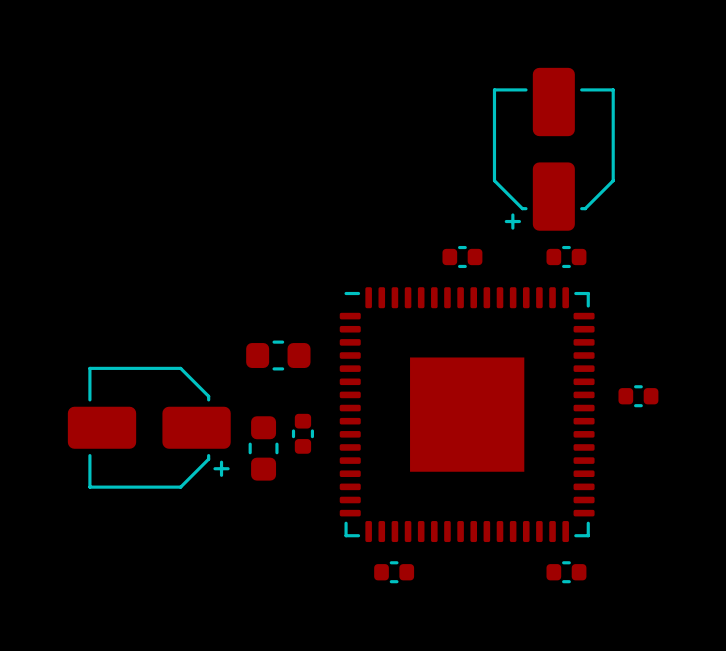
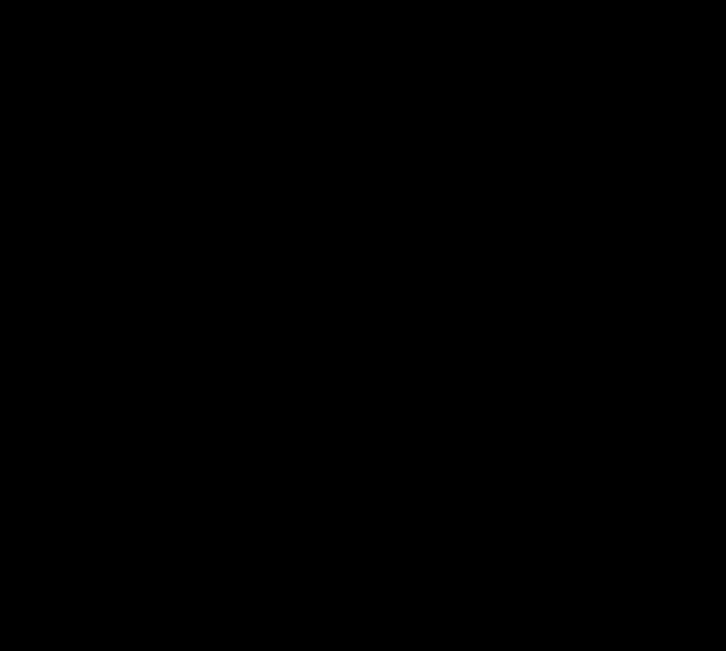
part: (553, 149) -> none
part: (462, 256) -> none
part: (566, 256) -> none
part: (278, 355) -> none
part: (638, 396) -> none
part: (467, 414) -> none
part: (149, 427) -> none
part: (302, 433) -> none
part: (263, 448) -> none
part: (394, 572) -> none
part: (566, 572) -> none

